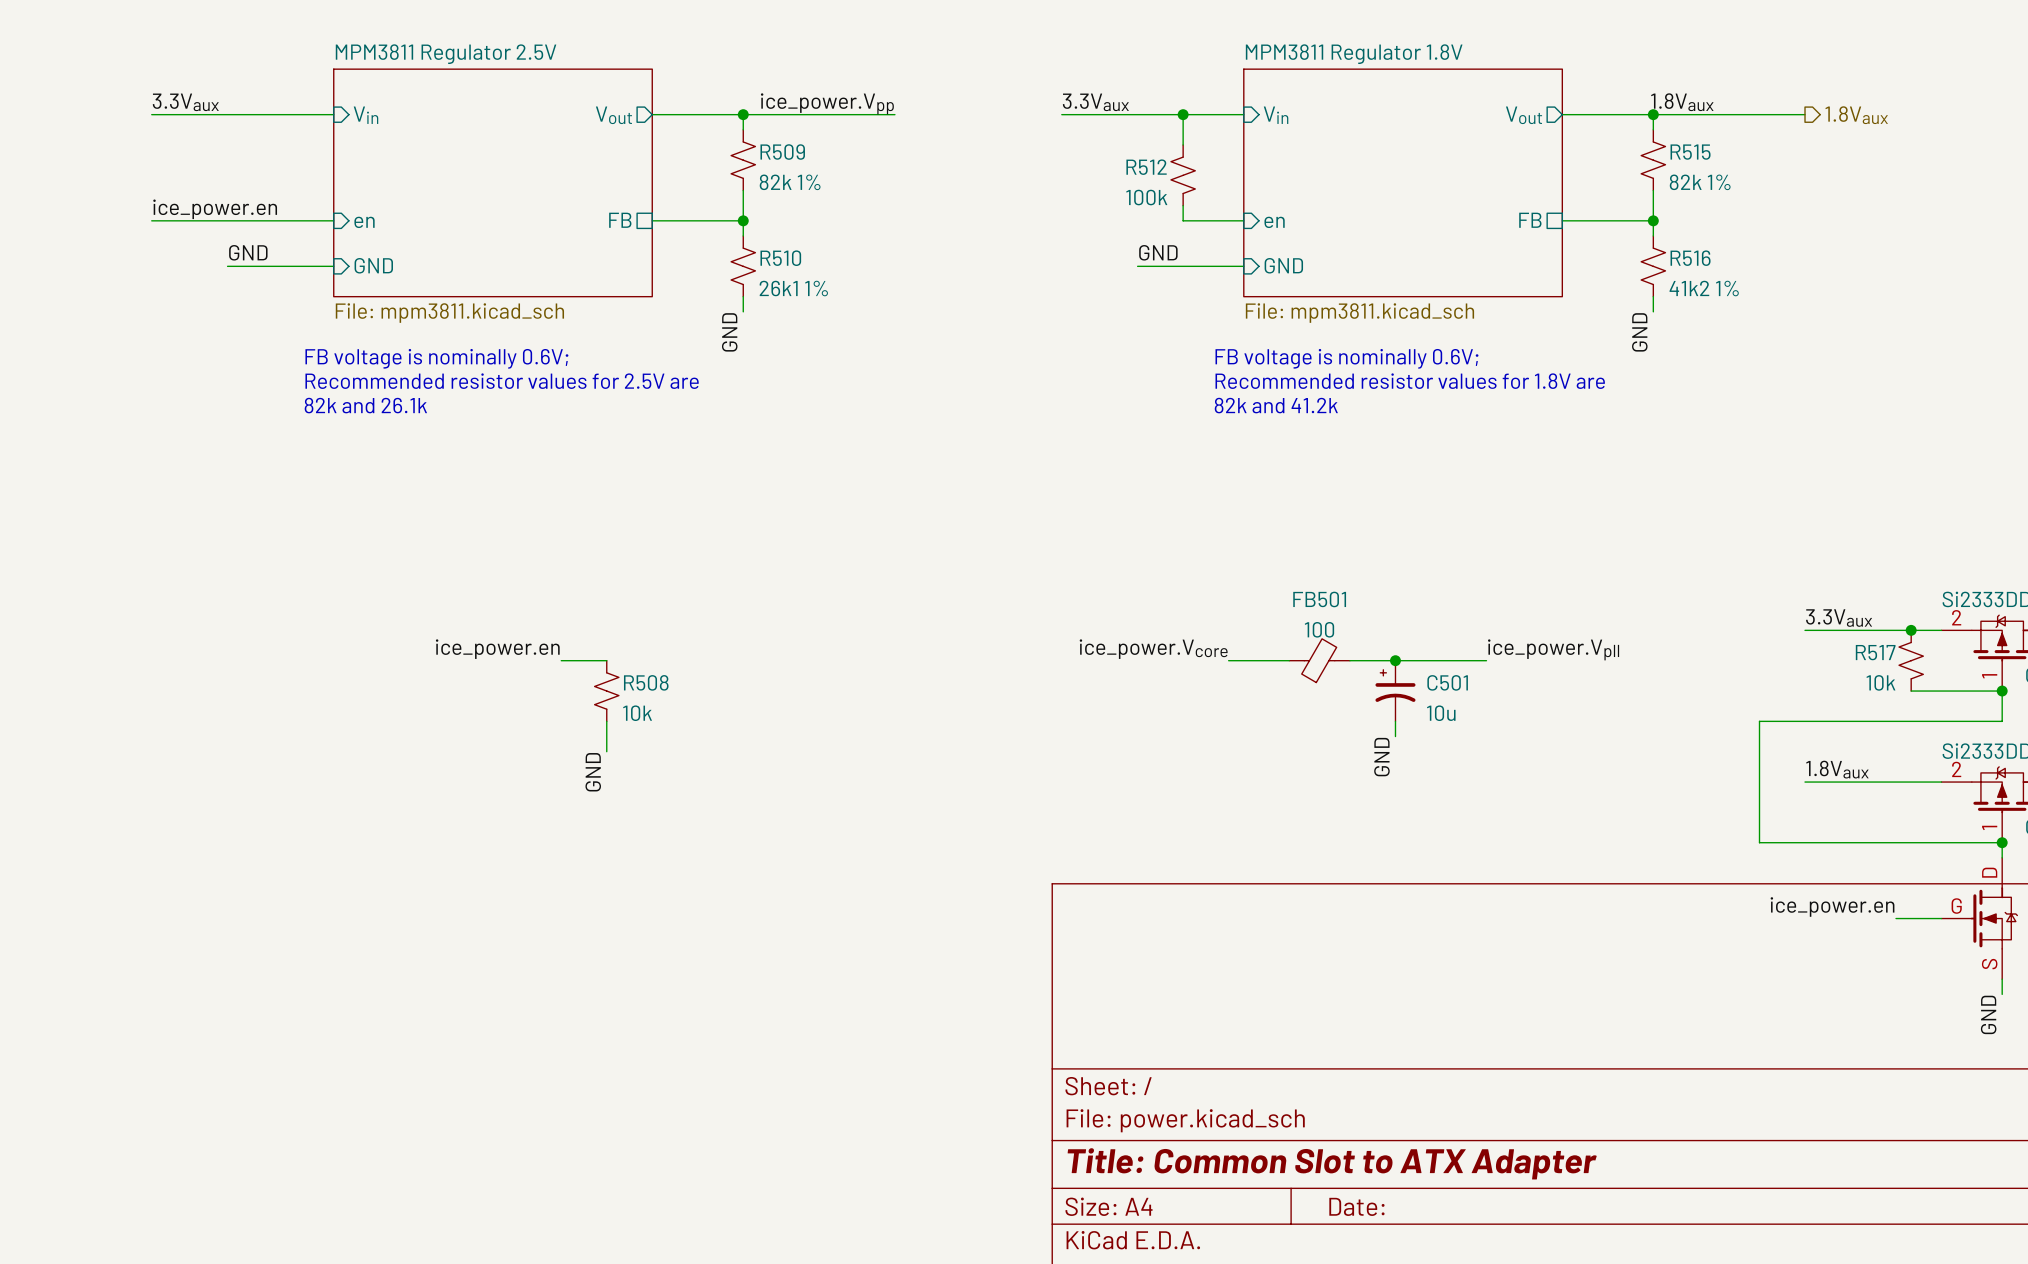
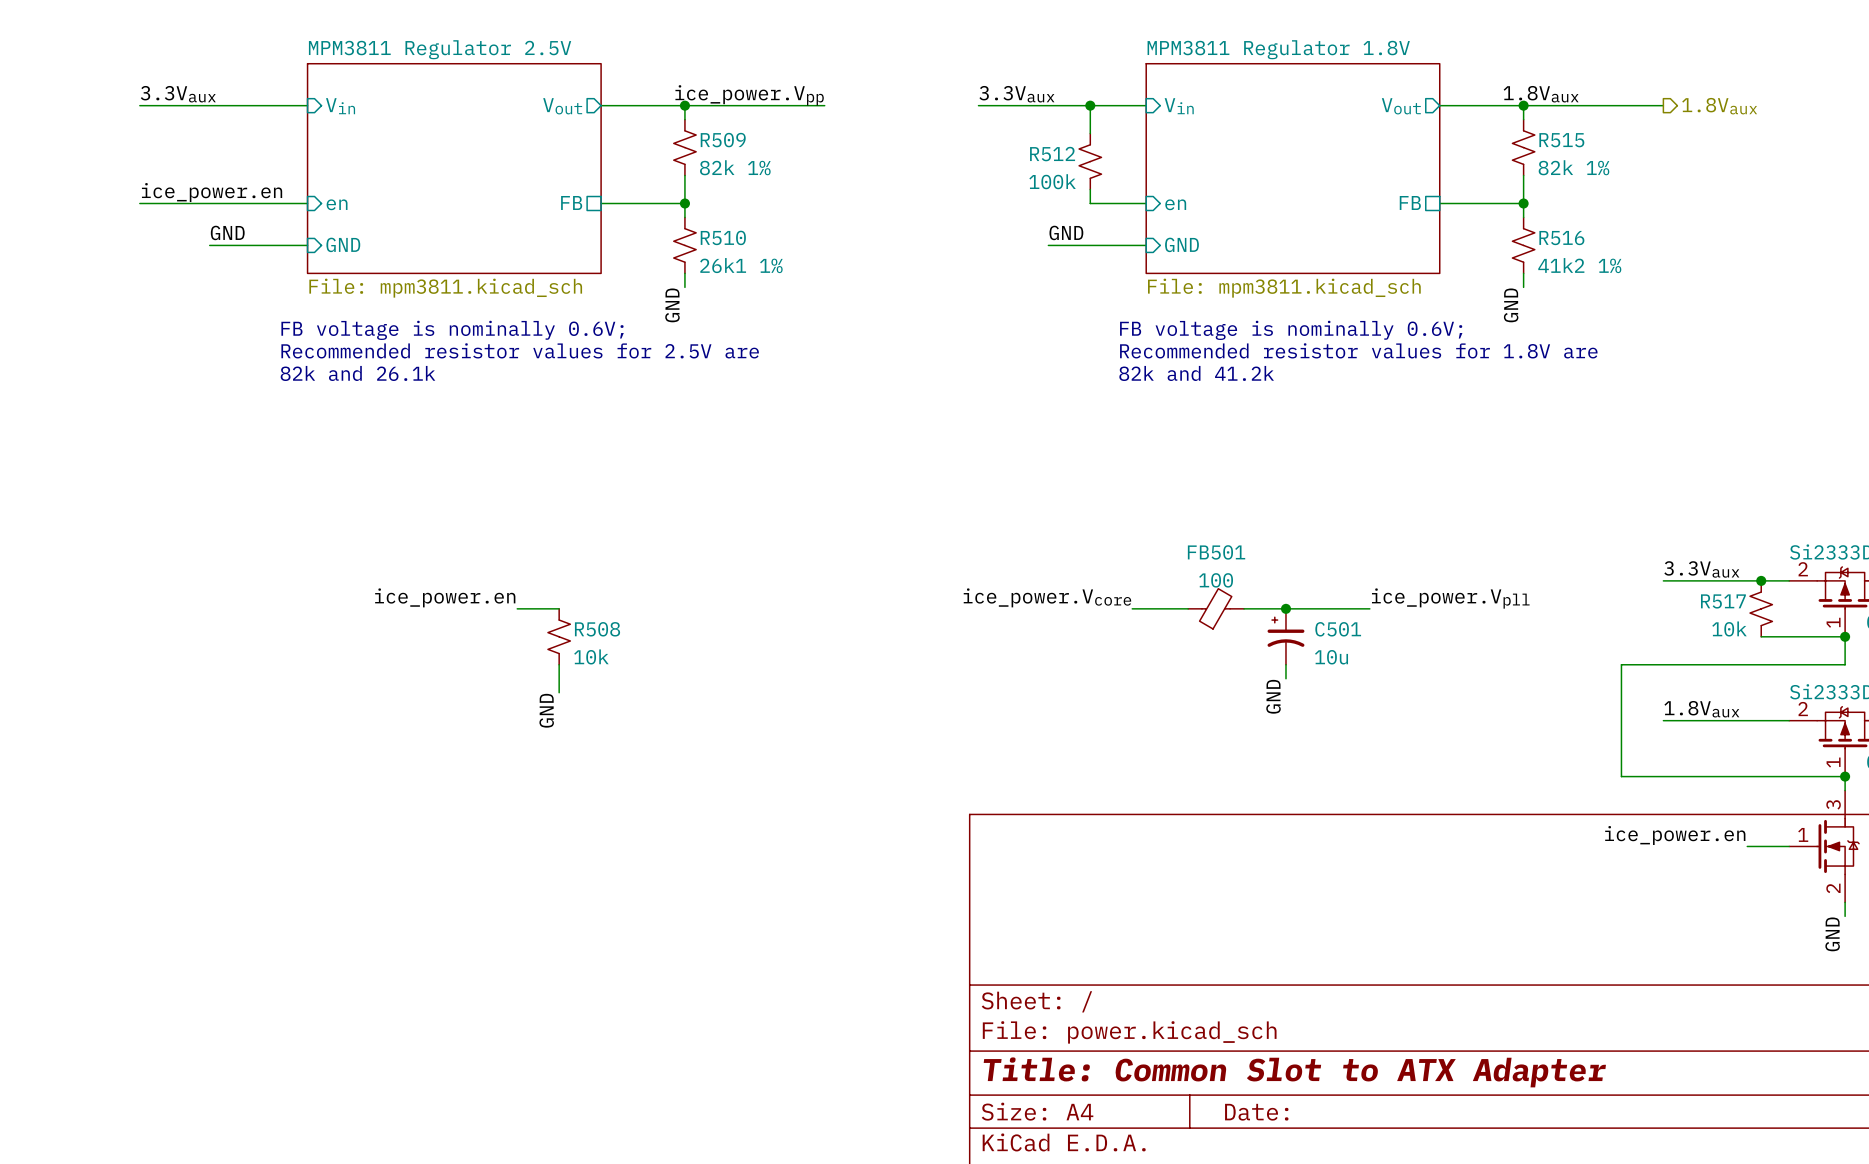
part pin number: D (1989, 872) -> 3 (1833, 804)
part pin number: G (1956, 906) -> 1 (1803, 834)
part pin number: S (1989, 964) -> 2 (1833, 888)

